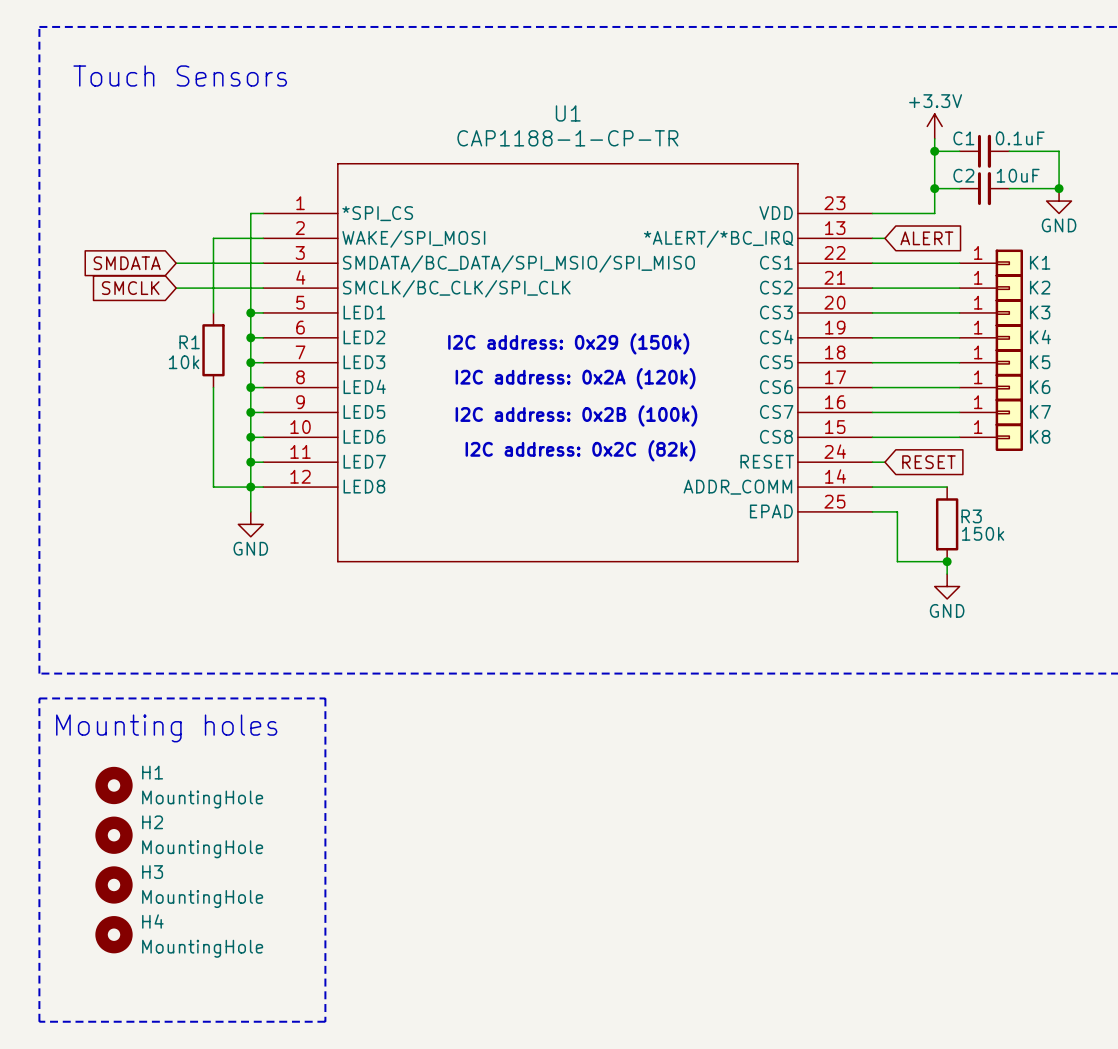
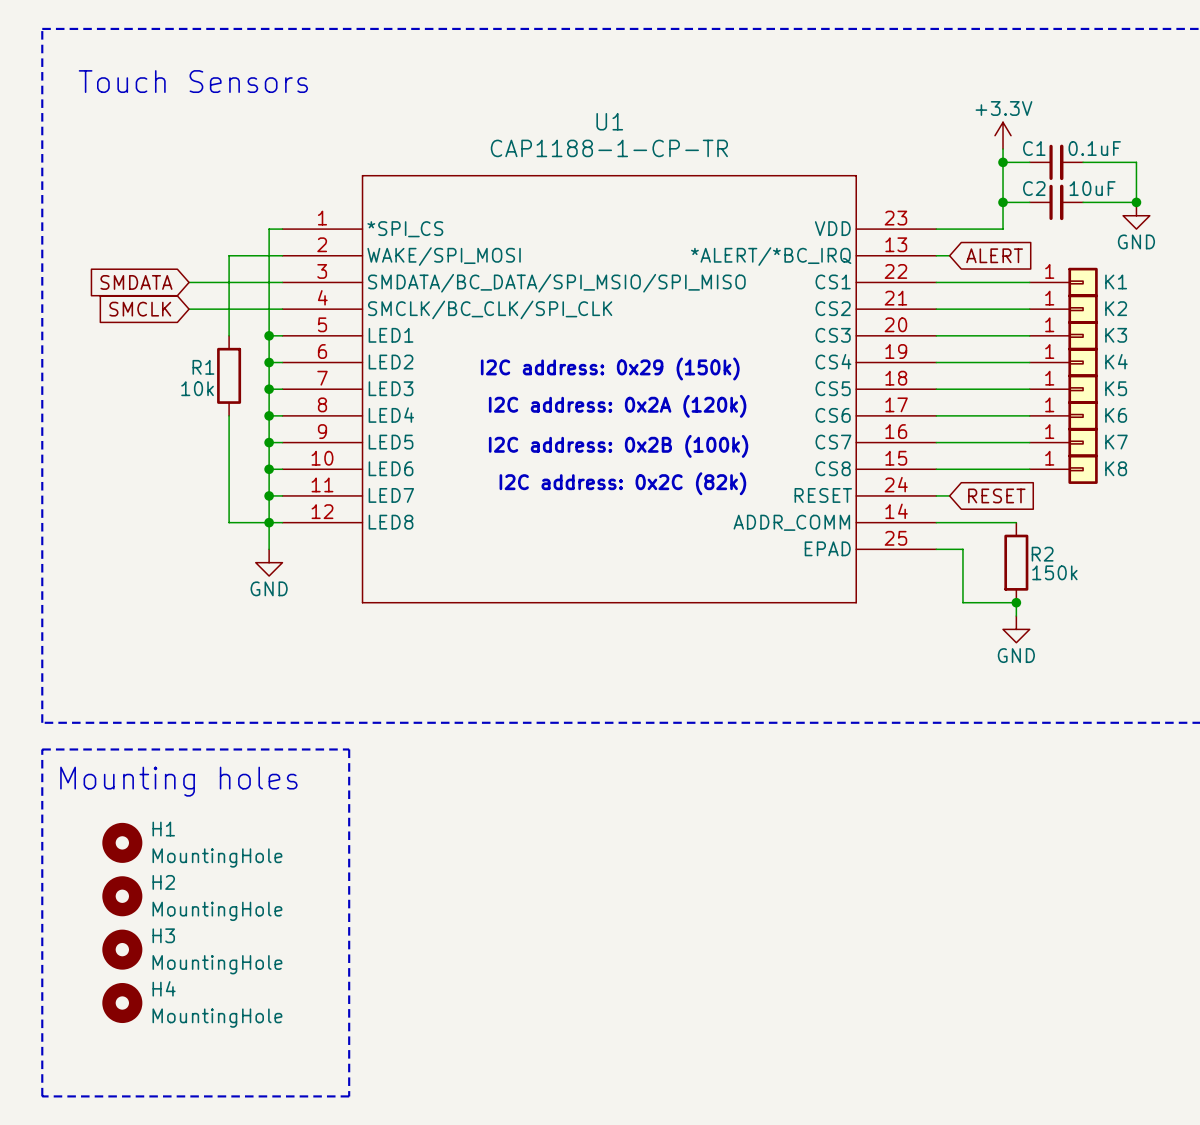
R3 name: R3 (971, 516) -> R2 (1042, 554)

